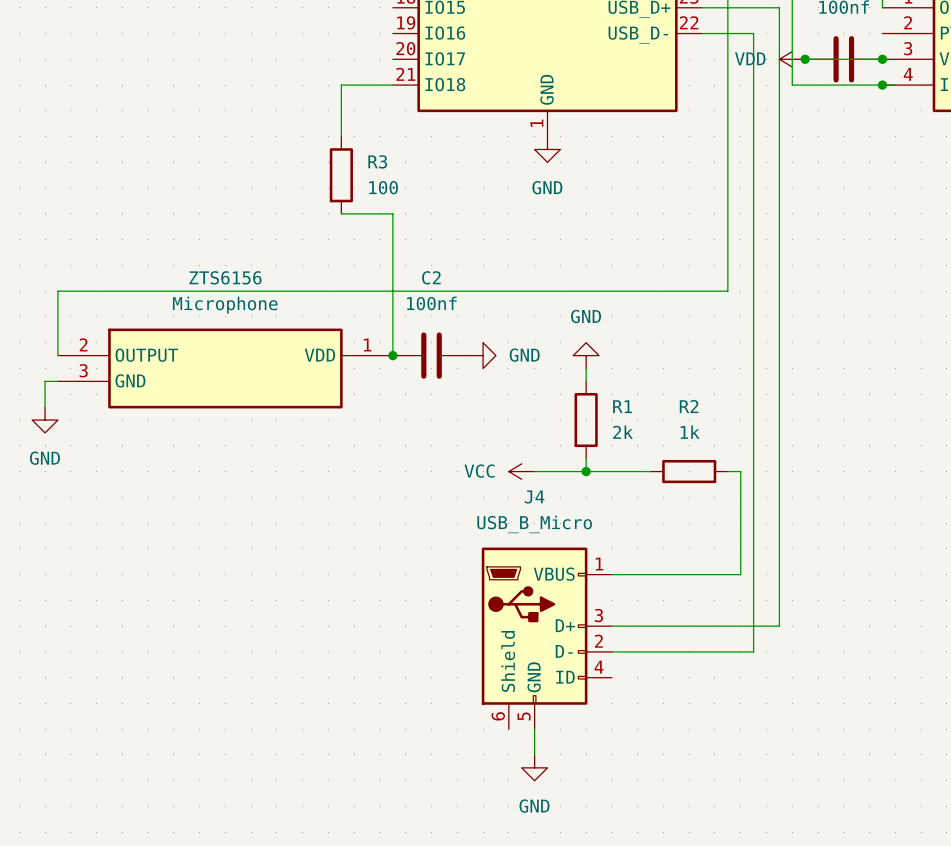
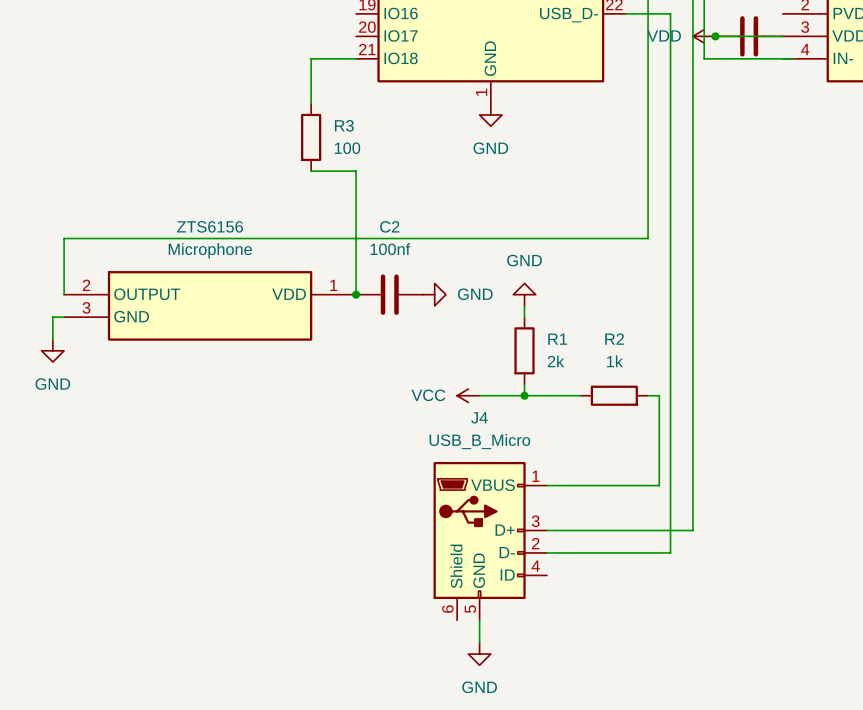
junction: (882, 59) -> none
junction: (882, 85) -> none

